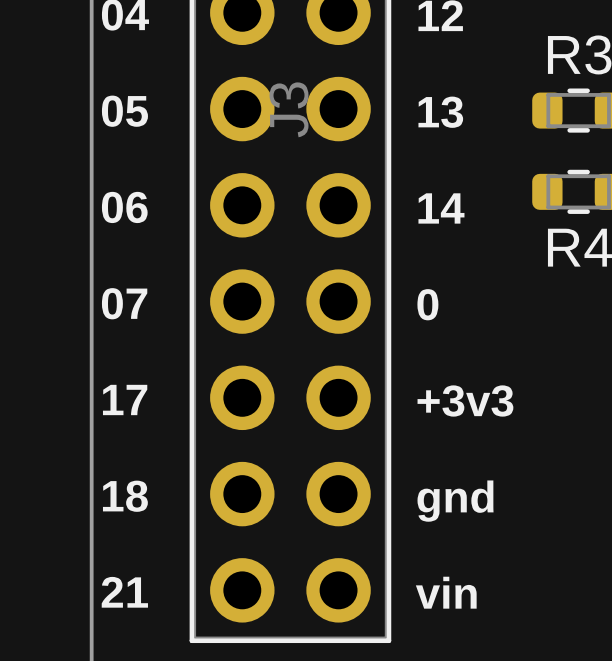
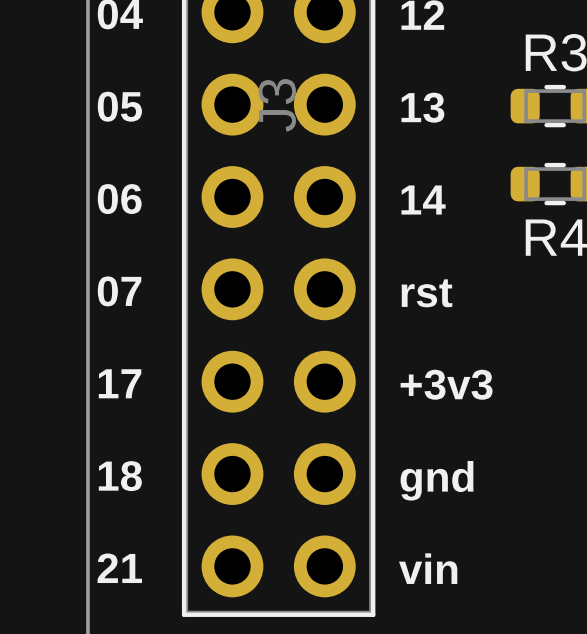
text: 0 (427, 304) -> rst (426, 293)

